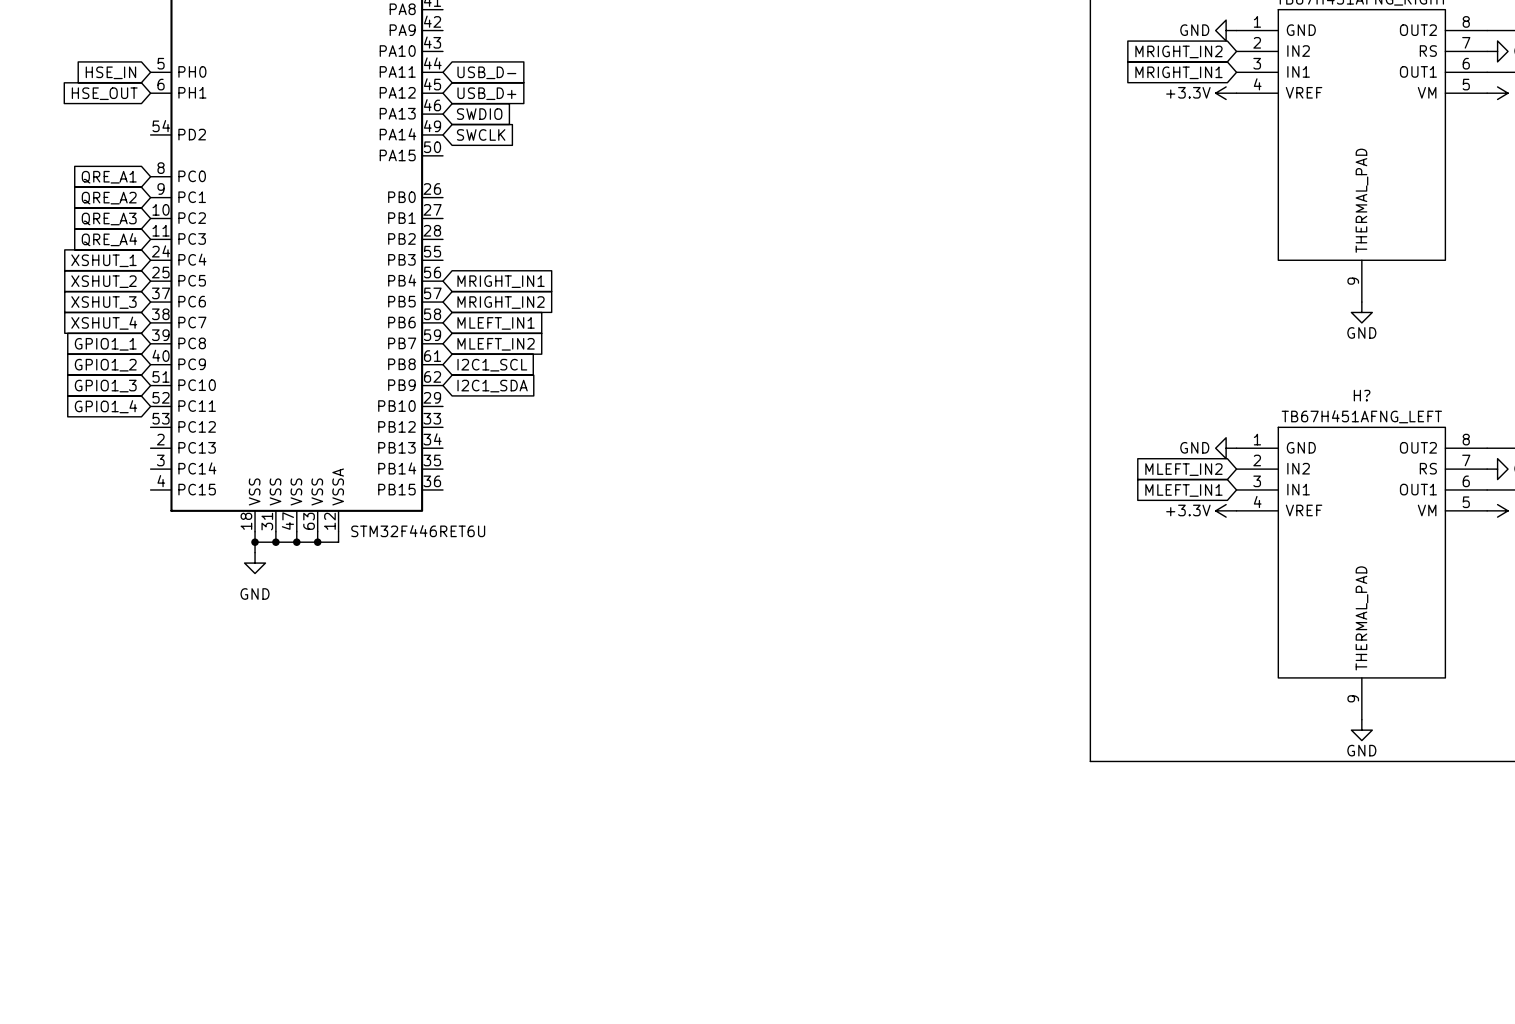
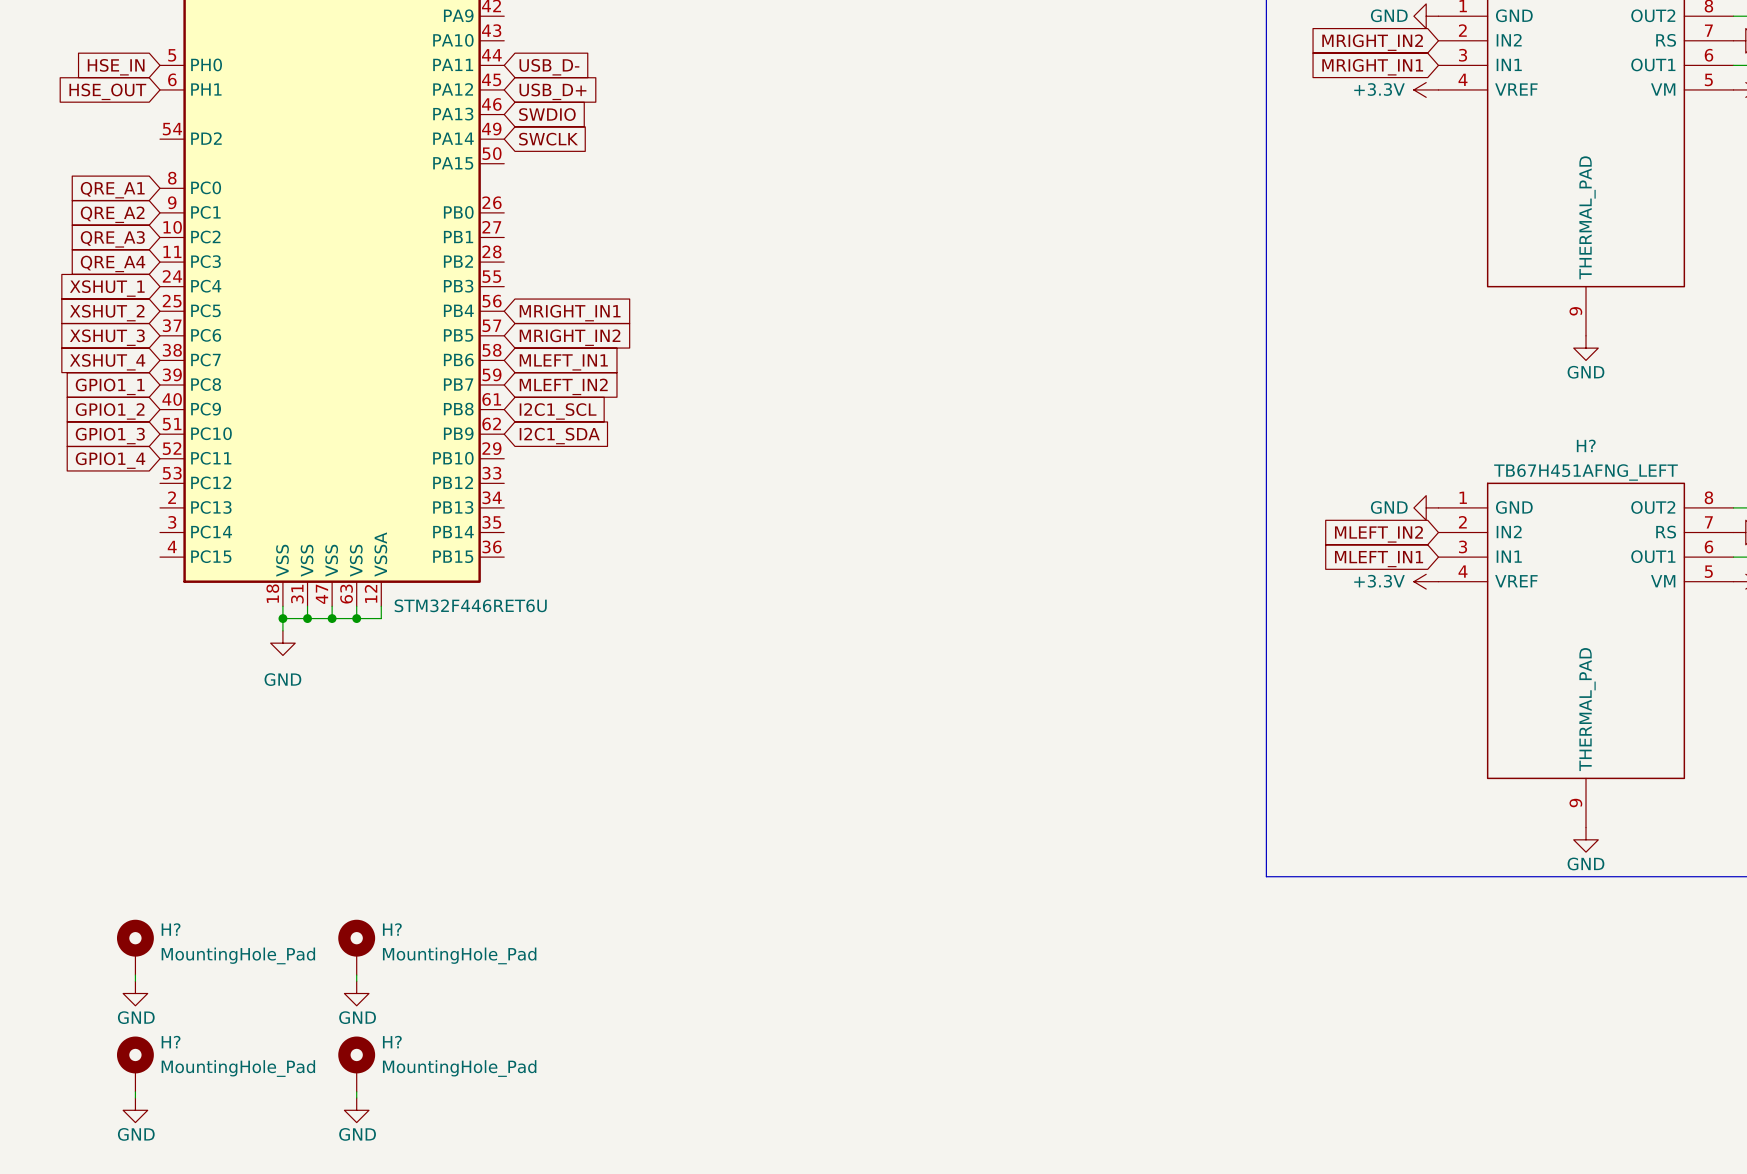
H?: none -> MountingHole_Pad (135, 947)
H?: none -> MountingHole_Pad (356, 947)
wire: none -> (135, 975) (135, 981)
wire: none -> (356, 975) (356, 981)
power symbol: none -> GND (135, 993)
power symbol: none -> GND (356, 993)
H?: none -> MountingHole_Pad (135, 1064)
H?: none -> MountingHole_Pad (356, 1064)
wire: none -> (135, 1091) (135, 1097)
wire: none -> (356, 1091) (356, 1097)
power symbol: none -> GND (135, 1110)
power symbol: none -> GND (356, 1110)

